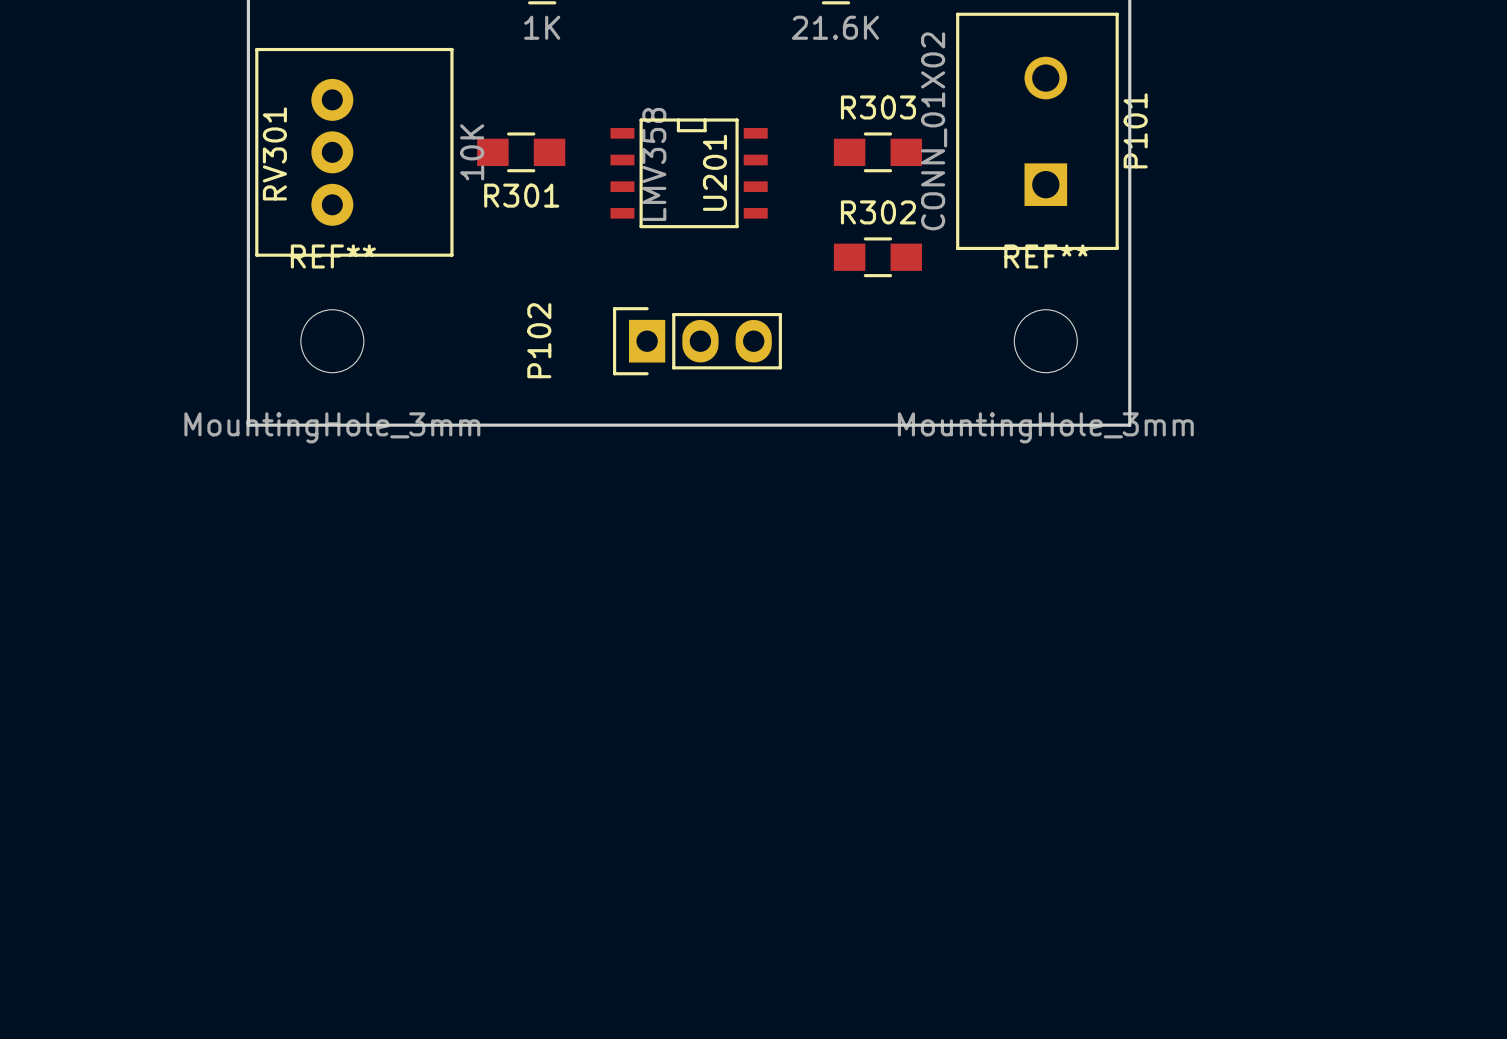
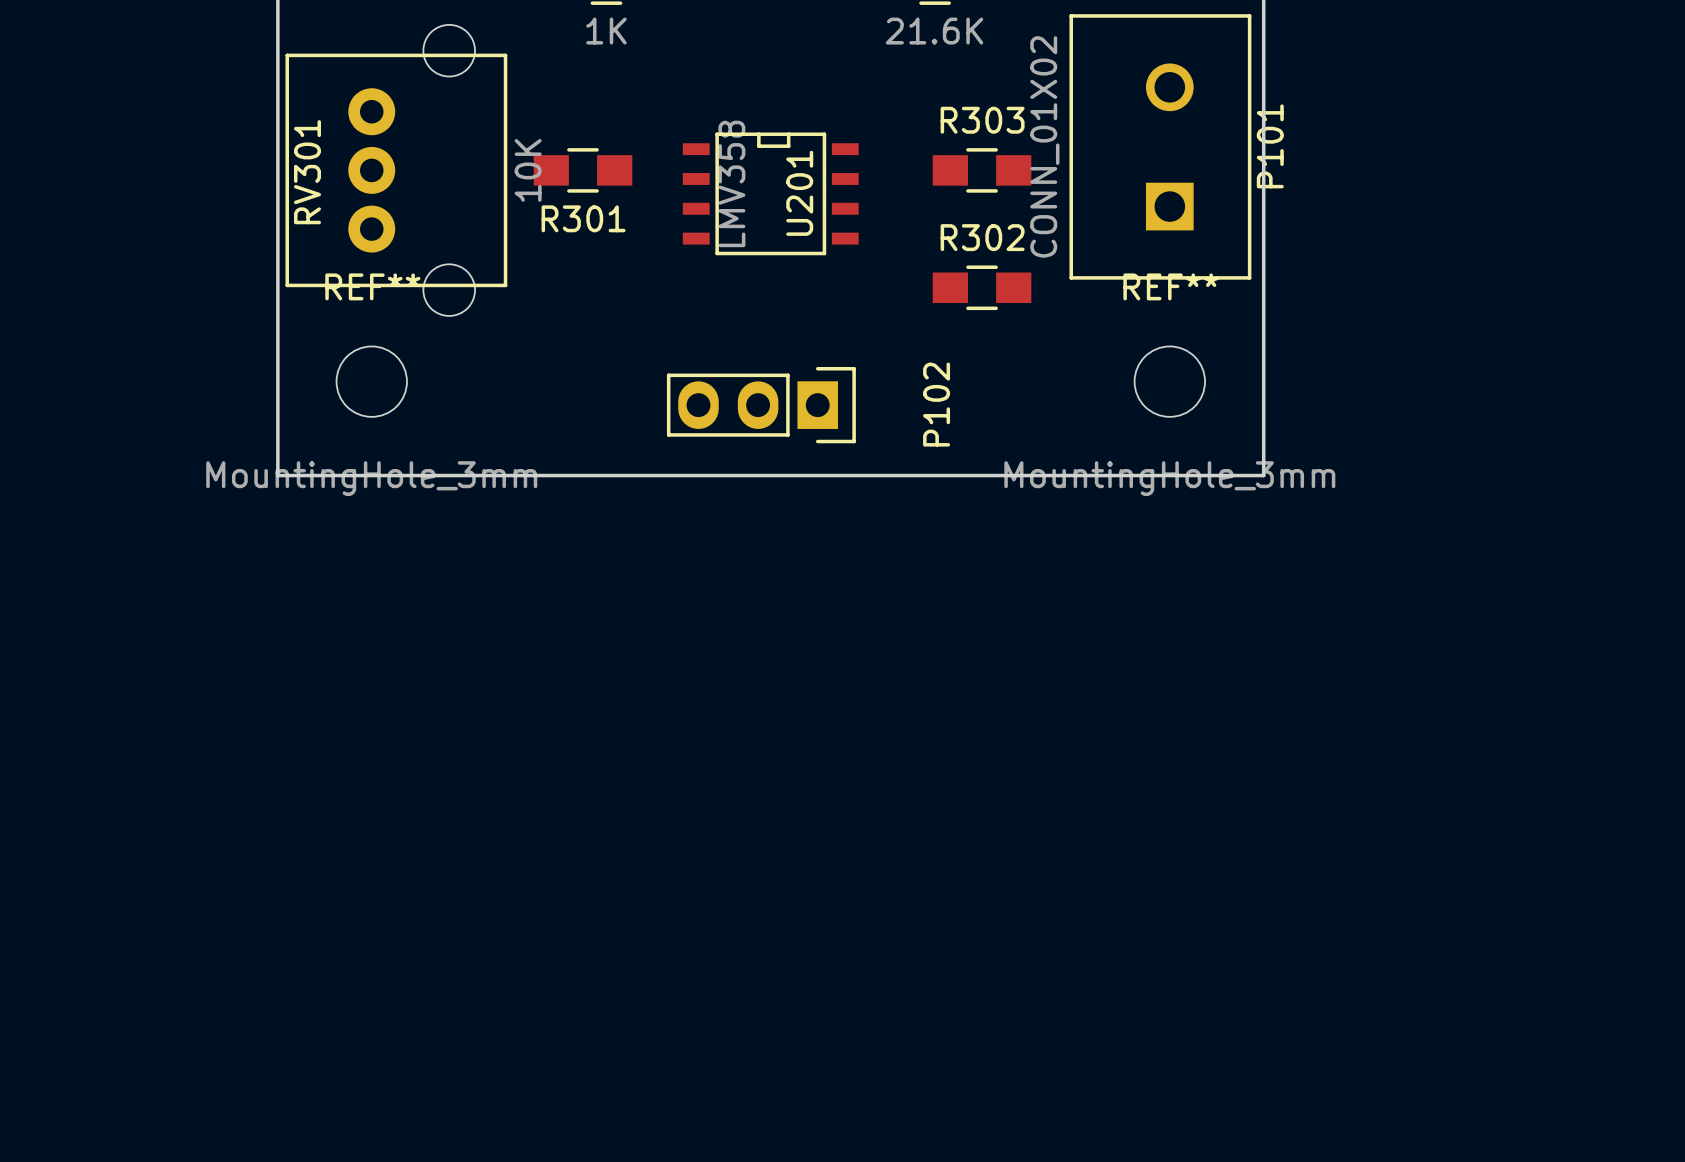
RV301 footprint: [255, 24, 454, 281] -> [285, 24, 508, 316]
P102 rotation: 0° (697, 341) -> 180° (761, 405)

